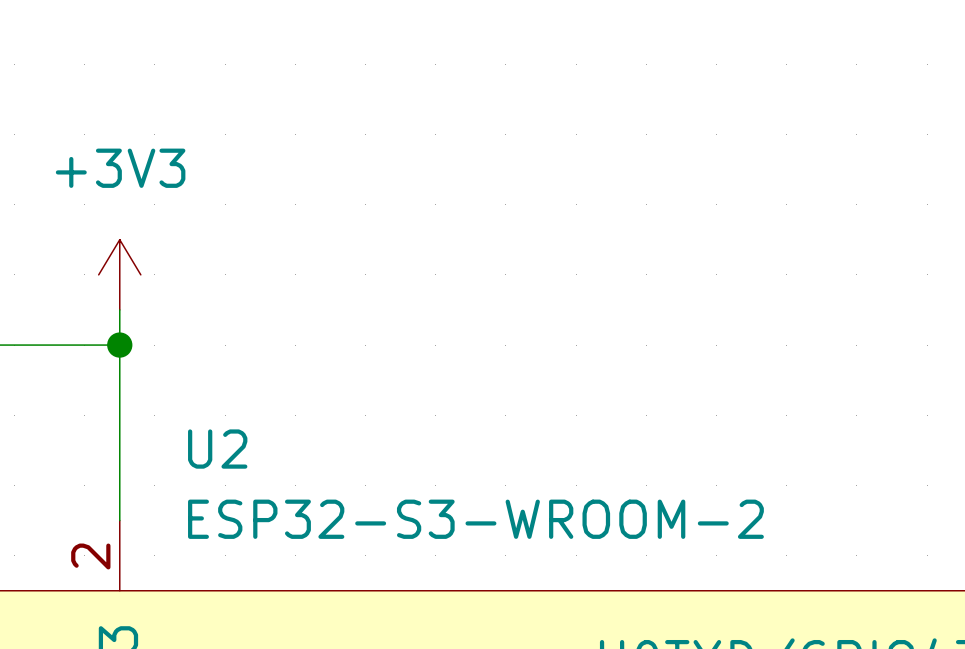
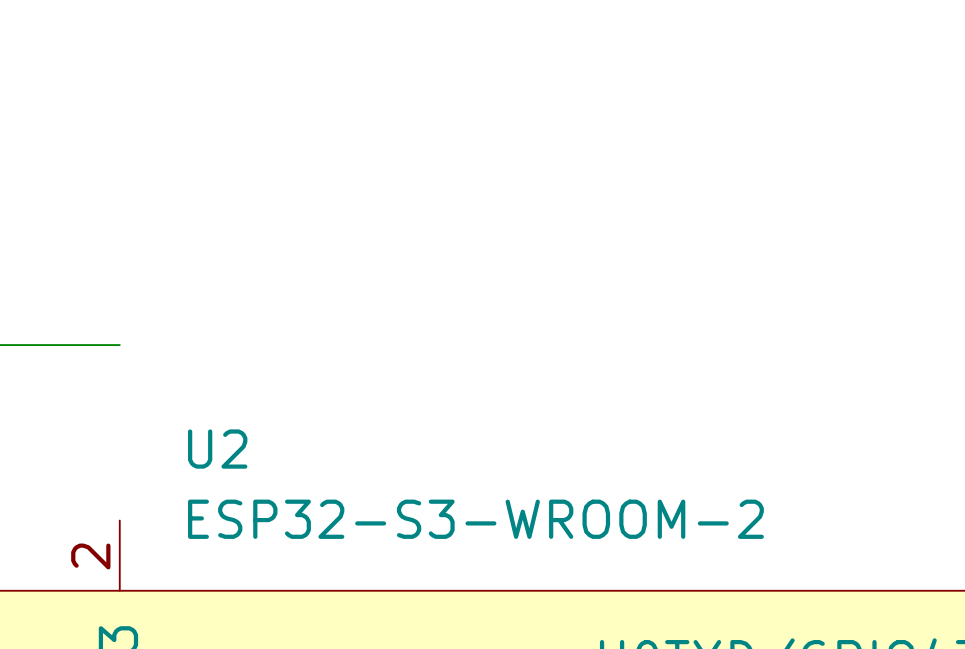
power symbol: +3V3 (119, 274) -> none
wire: (119, 309) (119, 520) -> none
junction: (119, 345) -> none

